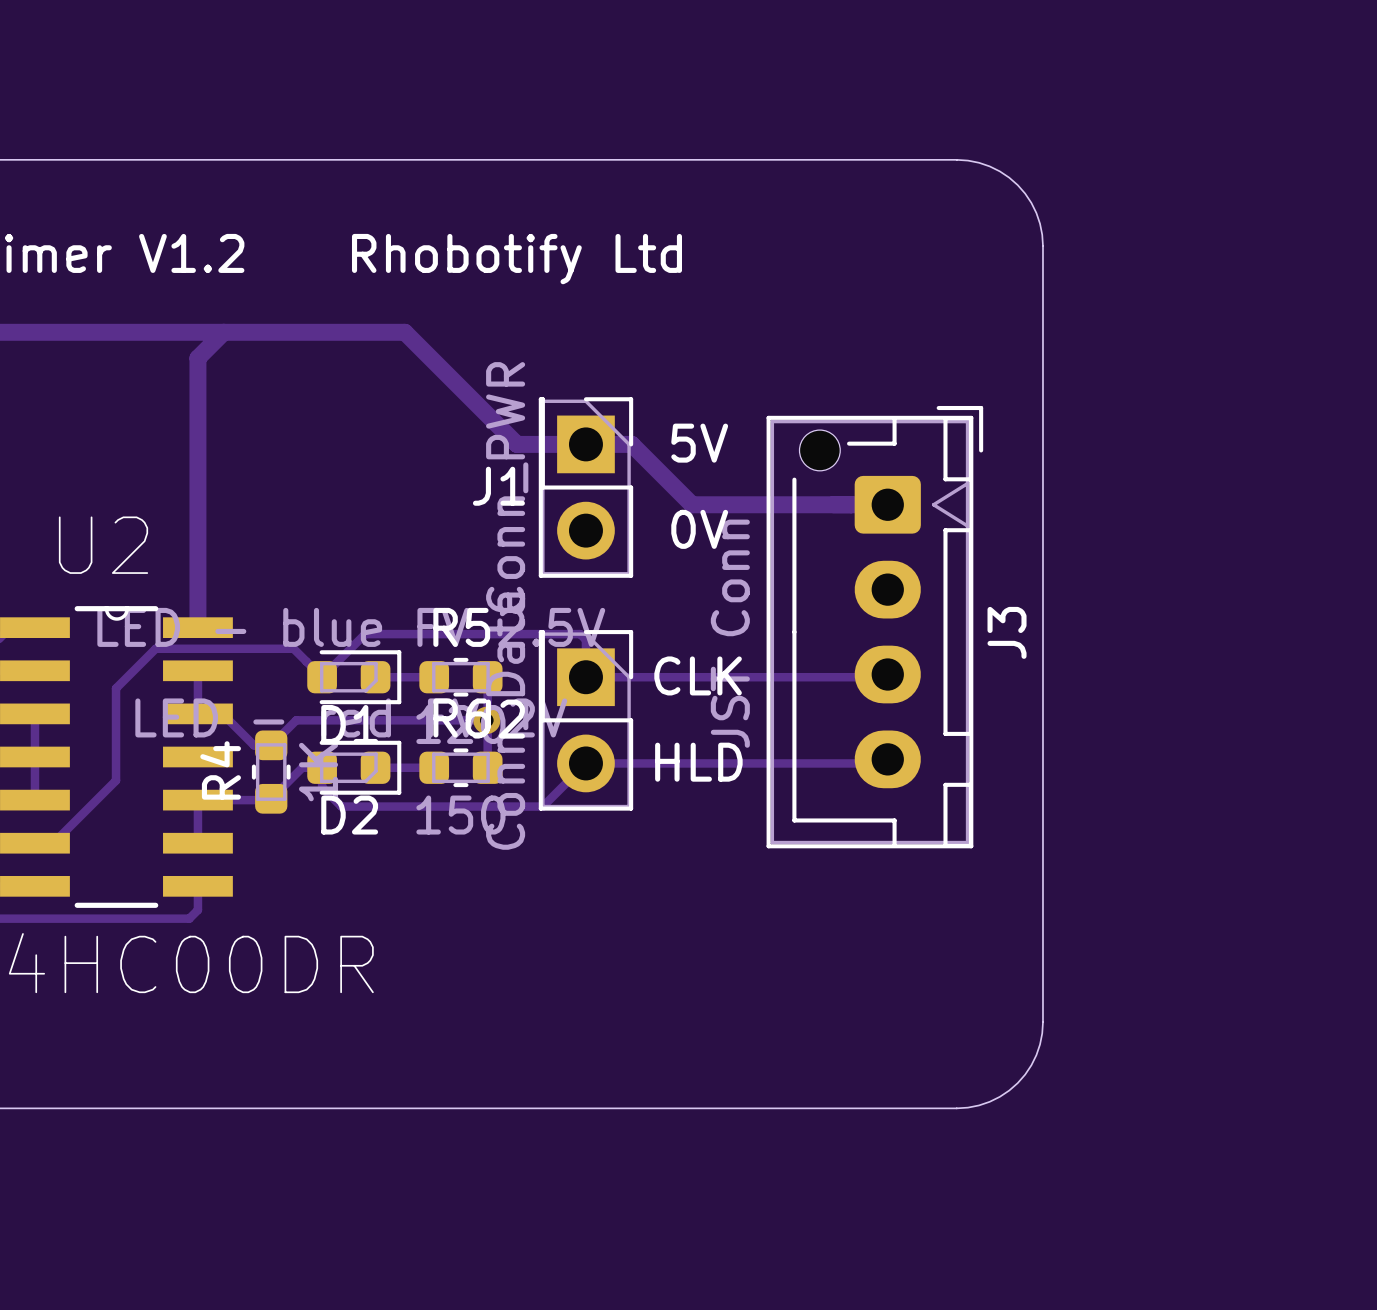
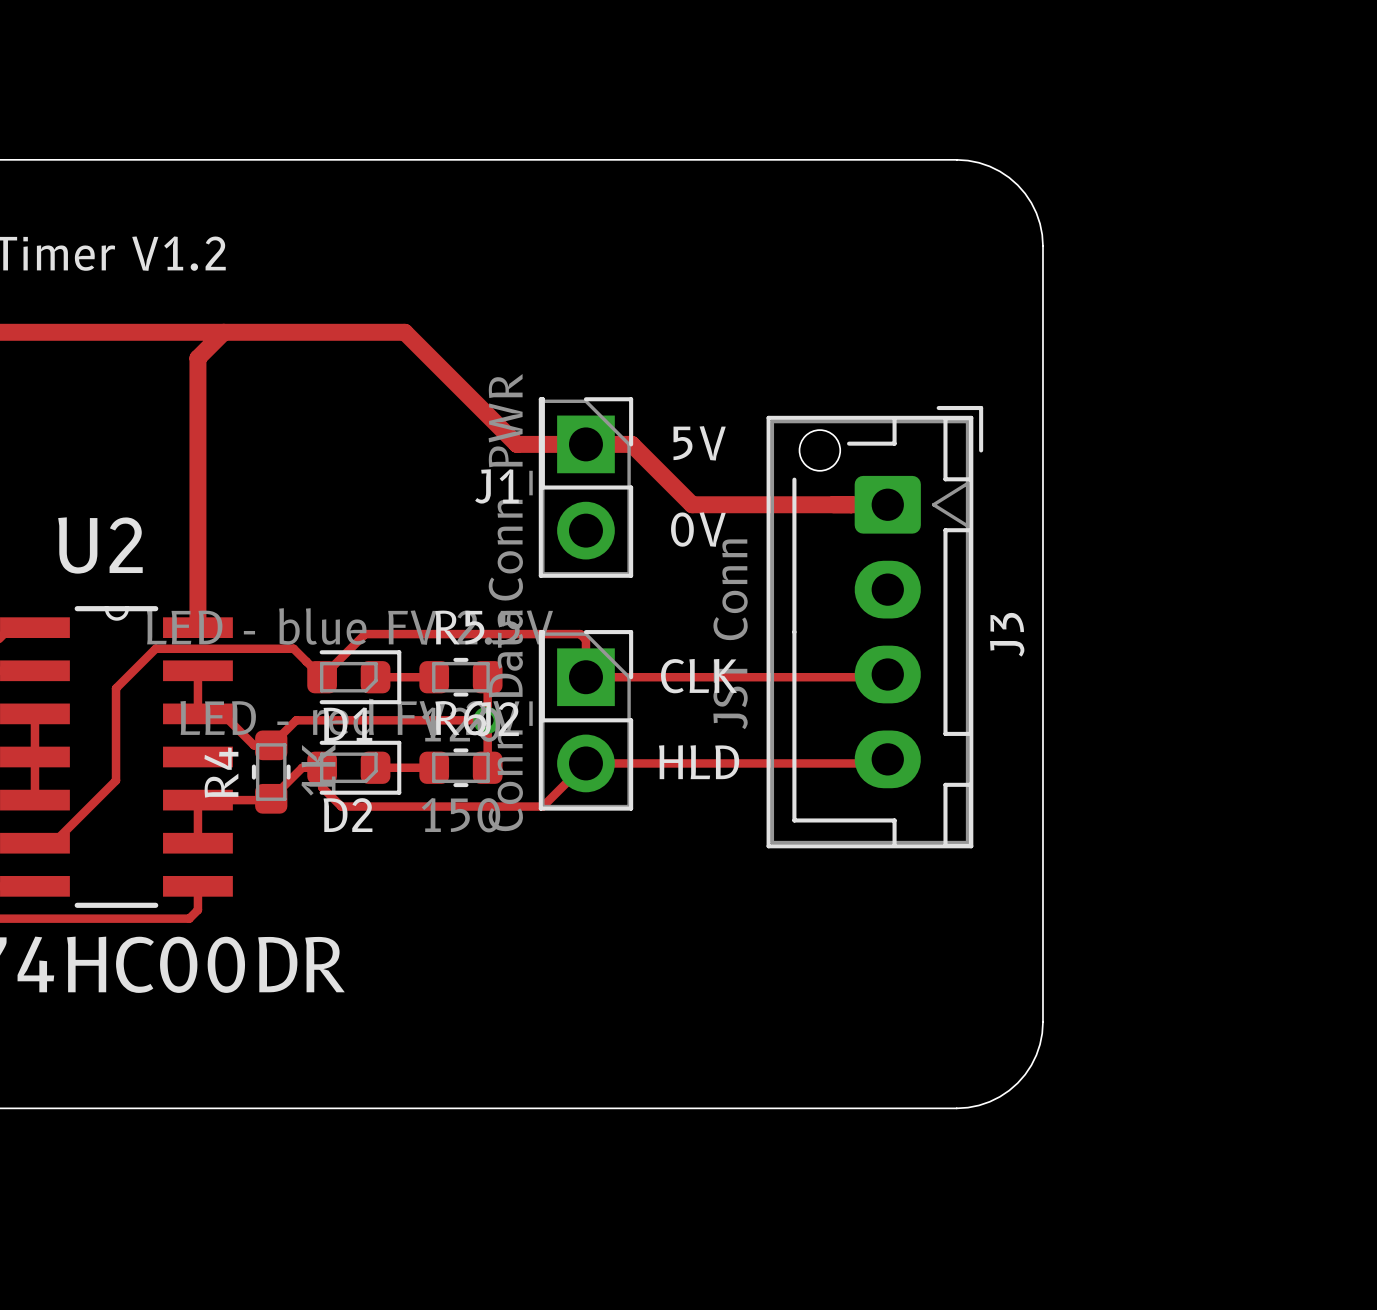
text: Rhobotify Ltd (516, 259) -> none

